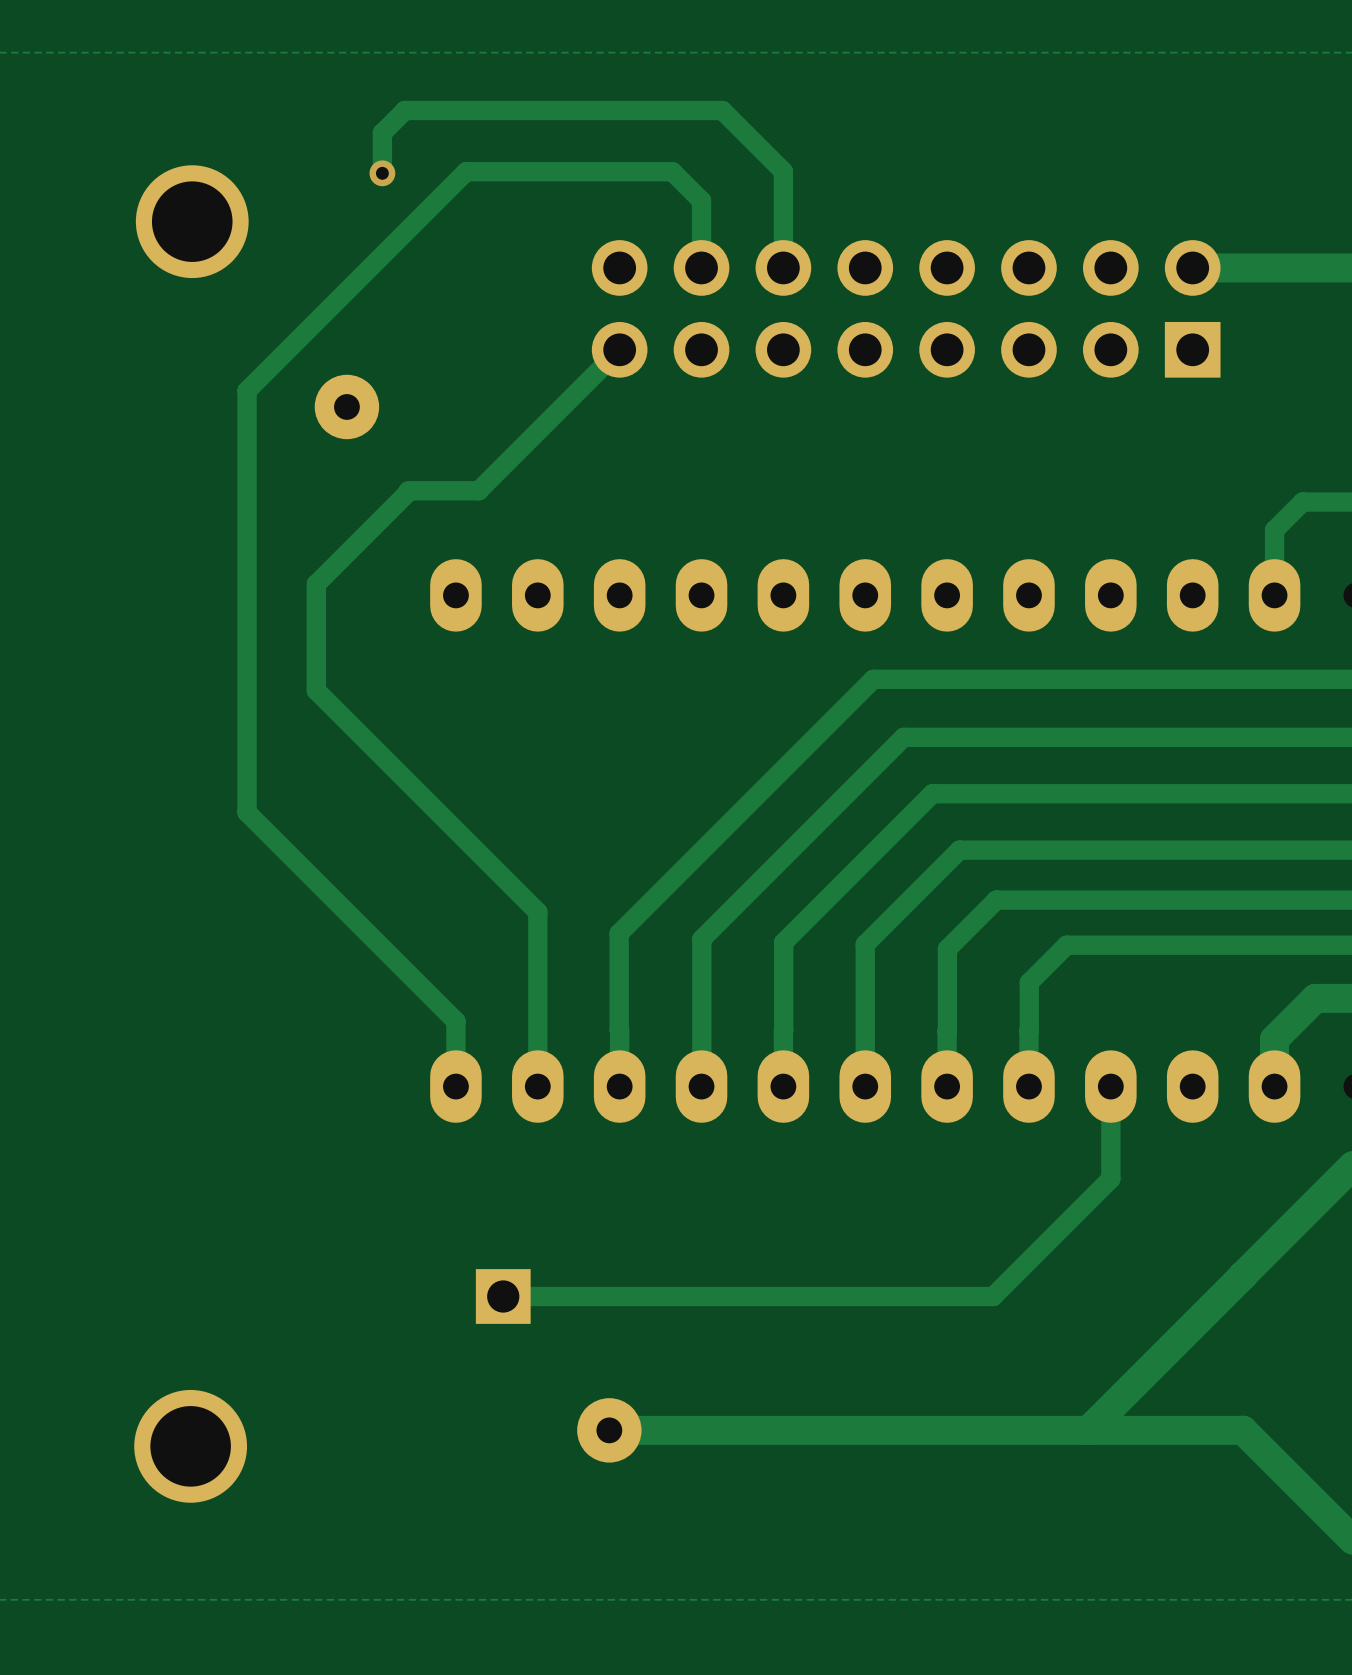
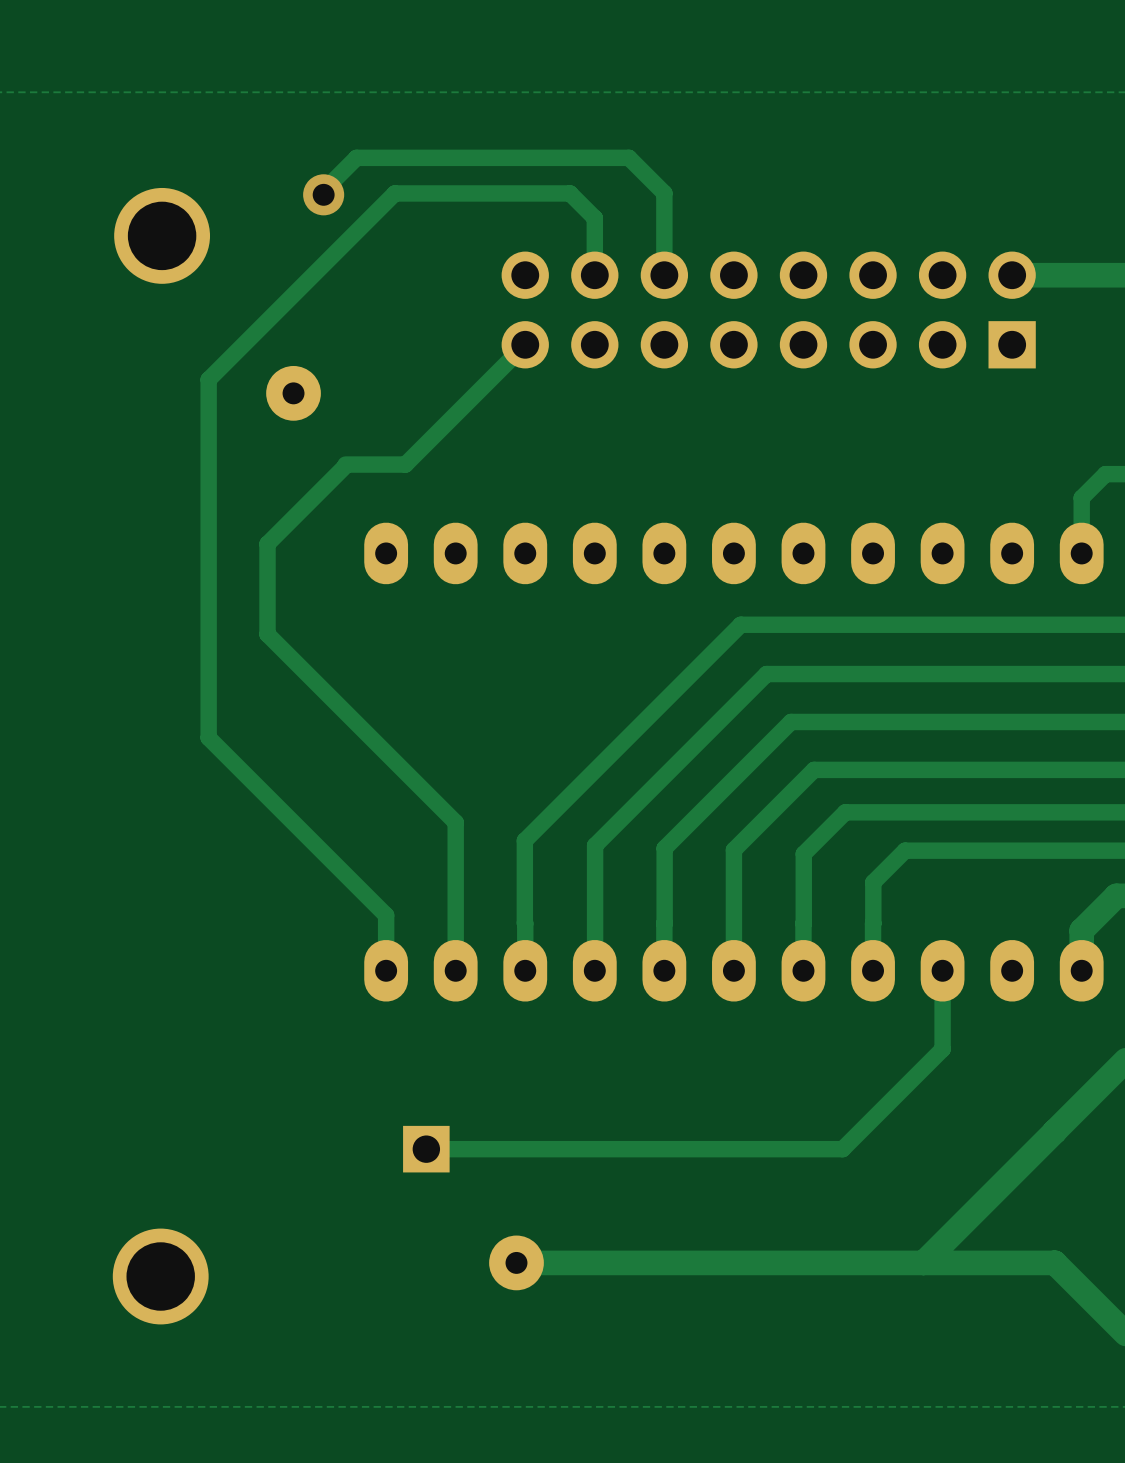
track: (741, 129) (722, 110) (404, 110) (382, 133) (382, 168) -> (628, 157) (356, 157) (323, 190)
via size: [369, 160, 396, 187] -> [303, 174, 345, 216]

